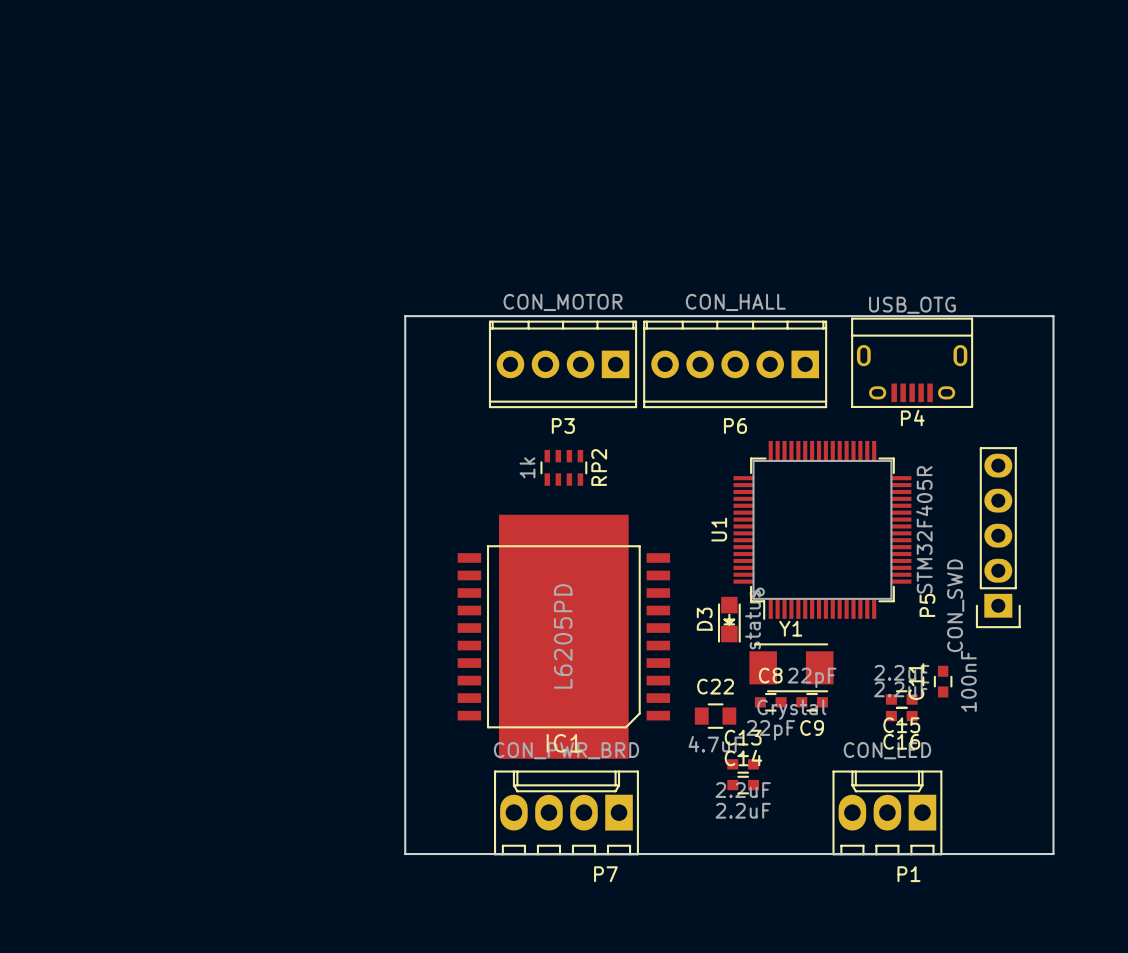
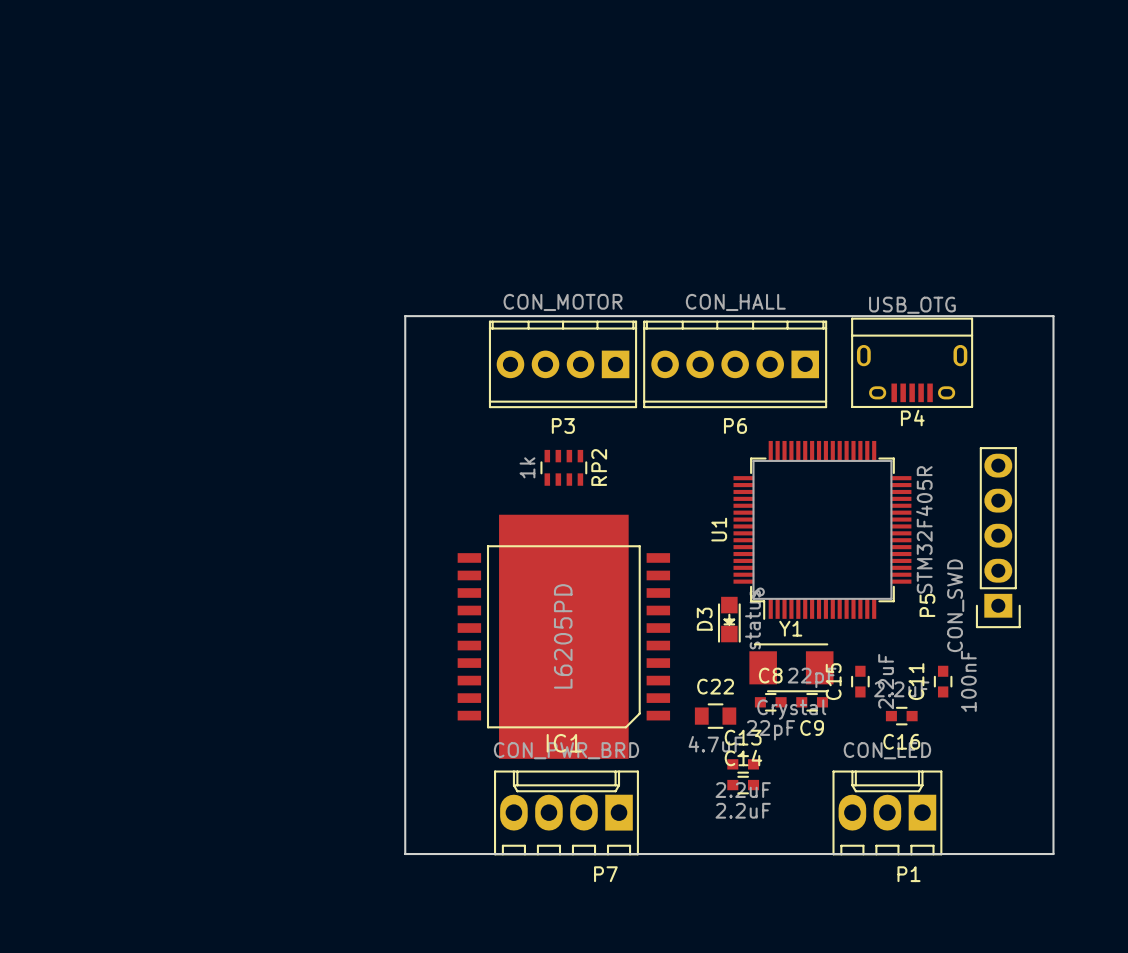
C15 rotation: 0° (901, 699) -> 90° clockwise (860, 681)
C15 position: (901, 699) -> (860, 681)

